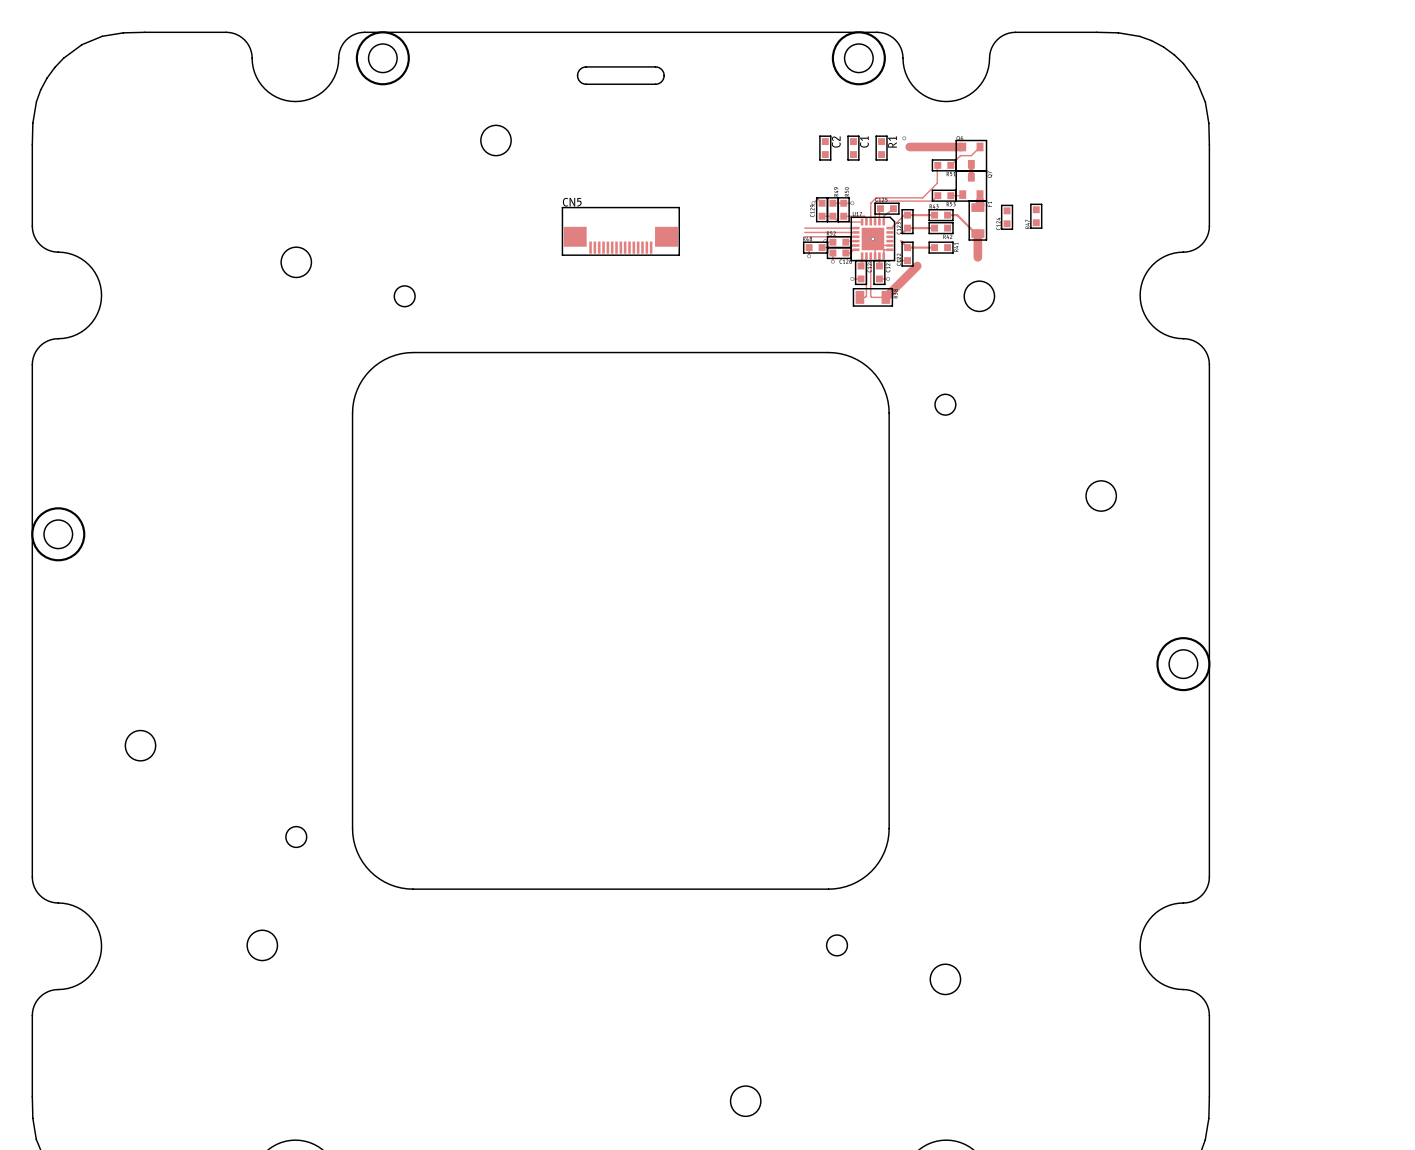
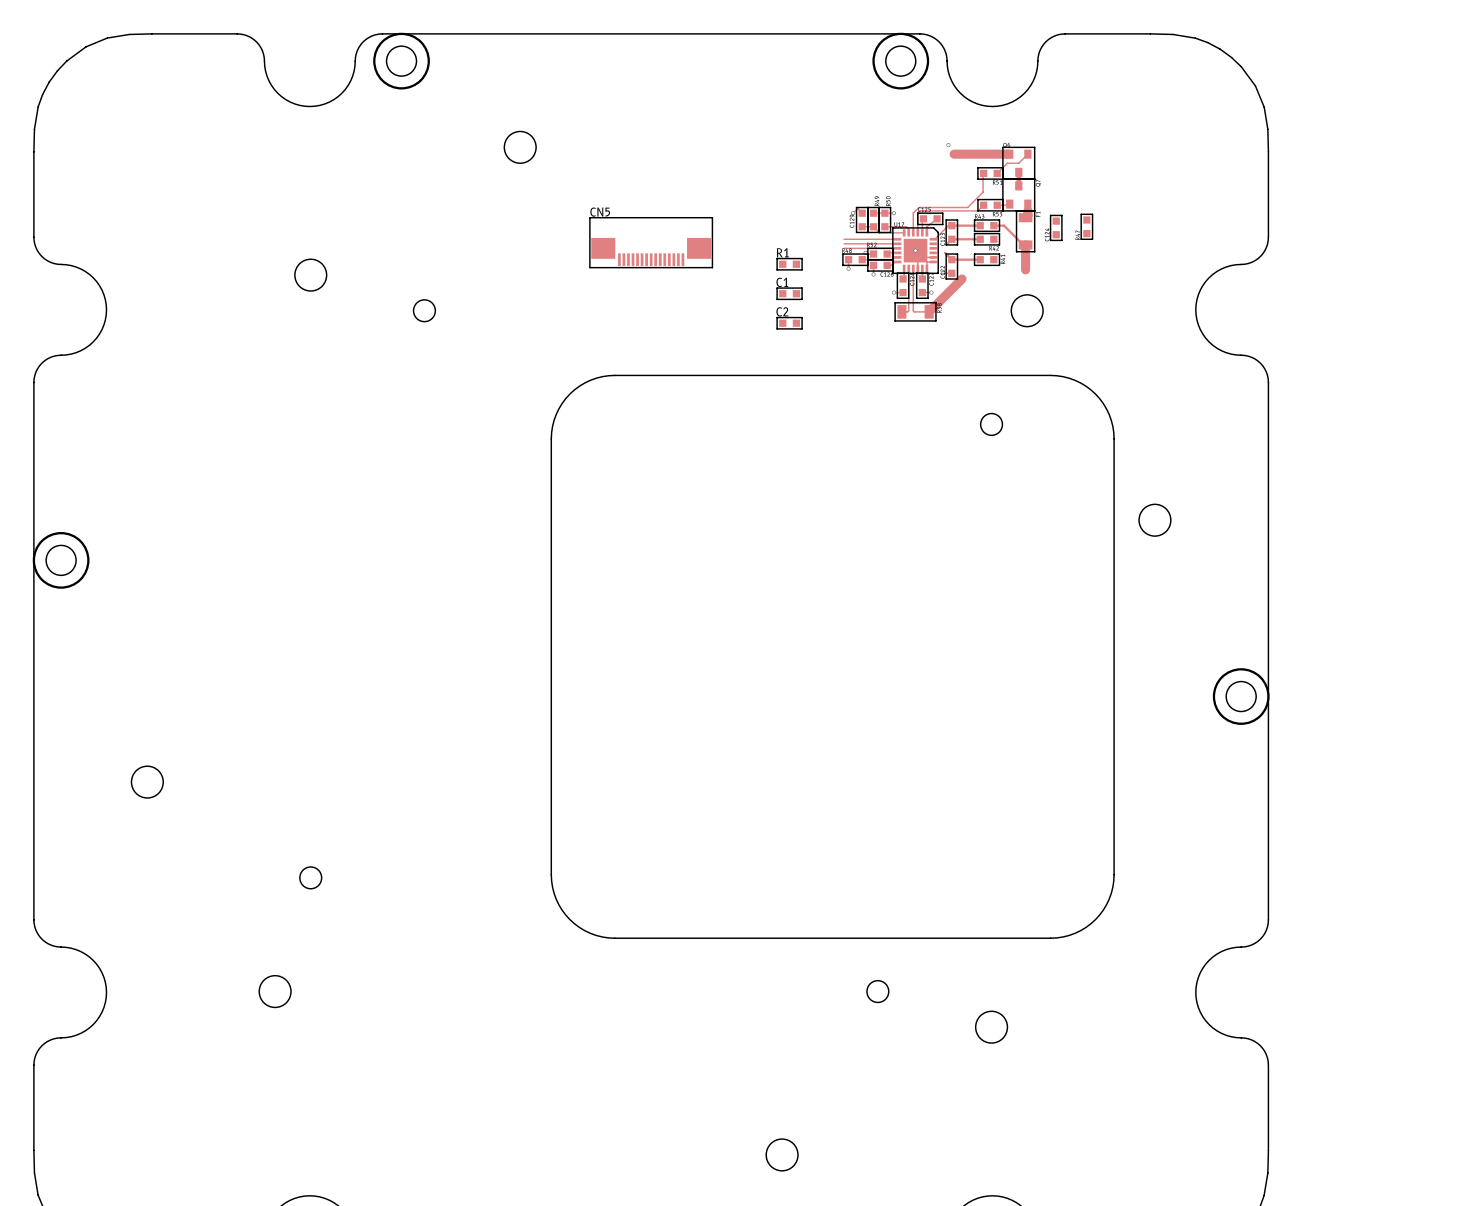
board edge: (586, 66) (656, 67) (662, 70) (664, 76) (661, 81) (656, 84) (585, 84) (579, 80) (577, 75) (580, 69) (586, 66) -> none
C2 rotation: 0° (825, 148) -> 90° clockwise (789, 323)
C2 position: (825, 148) -> (789, 323)
C1 rotation: 0° (853, 148) -> 90° clockwise (789, 293)
C1 position: (853, 148) -> (789, 293)
R1 rotation: 0° (881, 148) -> 90° clockwise (789, 264)
R1 position: (881, 148) -> (789, 264)
board edge: (413, 352) (828, 352) (851, 357) (867, 366) (875, 374) (884, 389) (889, 413) (889, 828) (884, 851) (875, 867) (867, 875) (851, 884) (828, 889) (413, 889) (389, 884) (374, 875) (366, 867) (357, 851) (352, 828) (352, 407) (359, 384) (374, 366) (389, 357) (413, 352) -> (614, 375) (1050, 375) (1074, 380) (1090, 389) (1099, 398) (1109, 414) (1114, 438) (1114, 874) (1109, 899) (1099, 915) (1090, 923) (1074, 933) (1050, 938) (614, 938) (590, 933) (574, 923) (565, 915) (556, 899) (551, 874) (551, 432) (558, 409) (574, 389) (590, 380) (614, 375)

